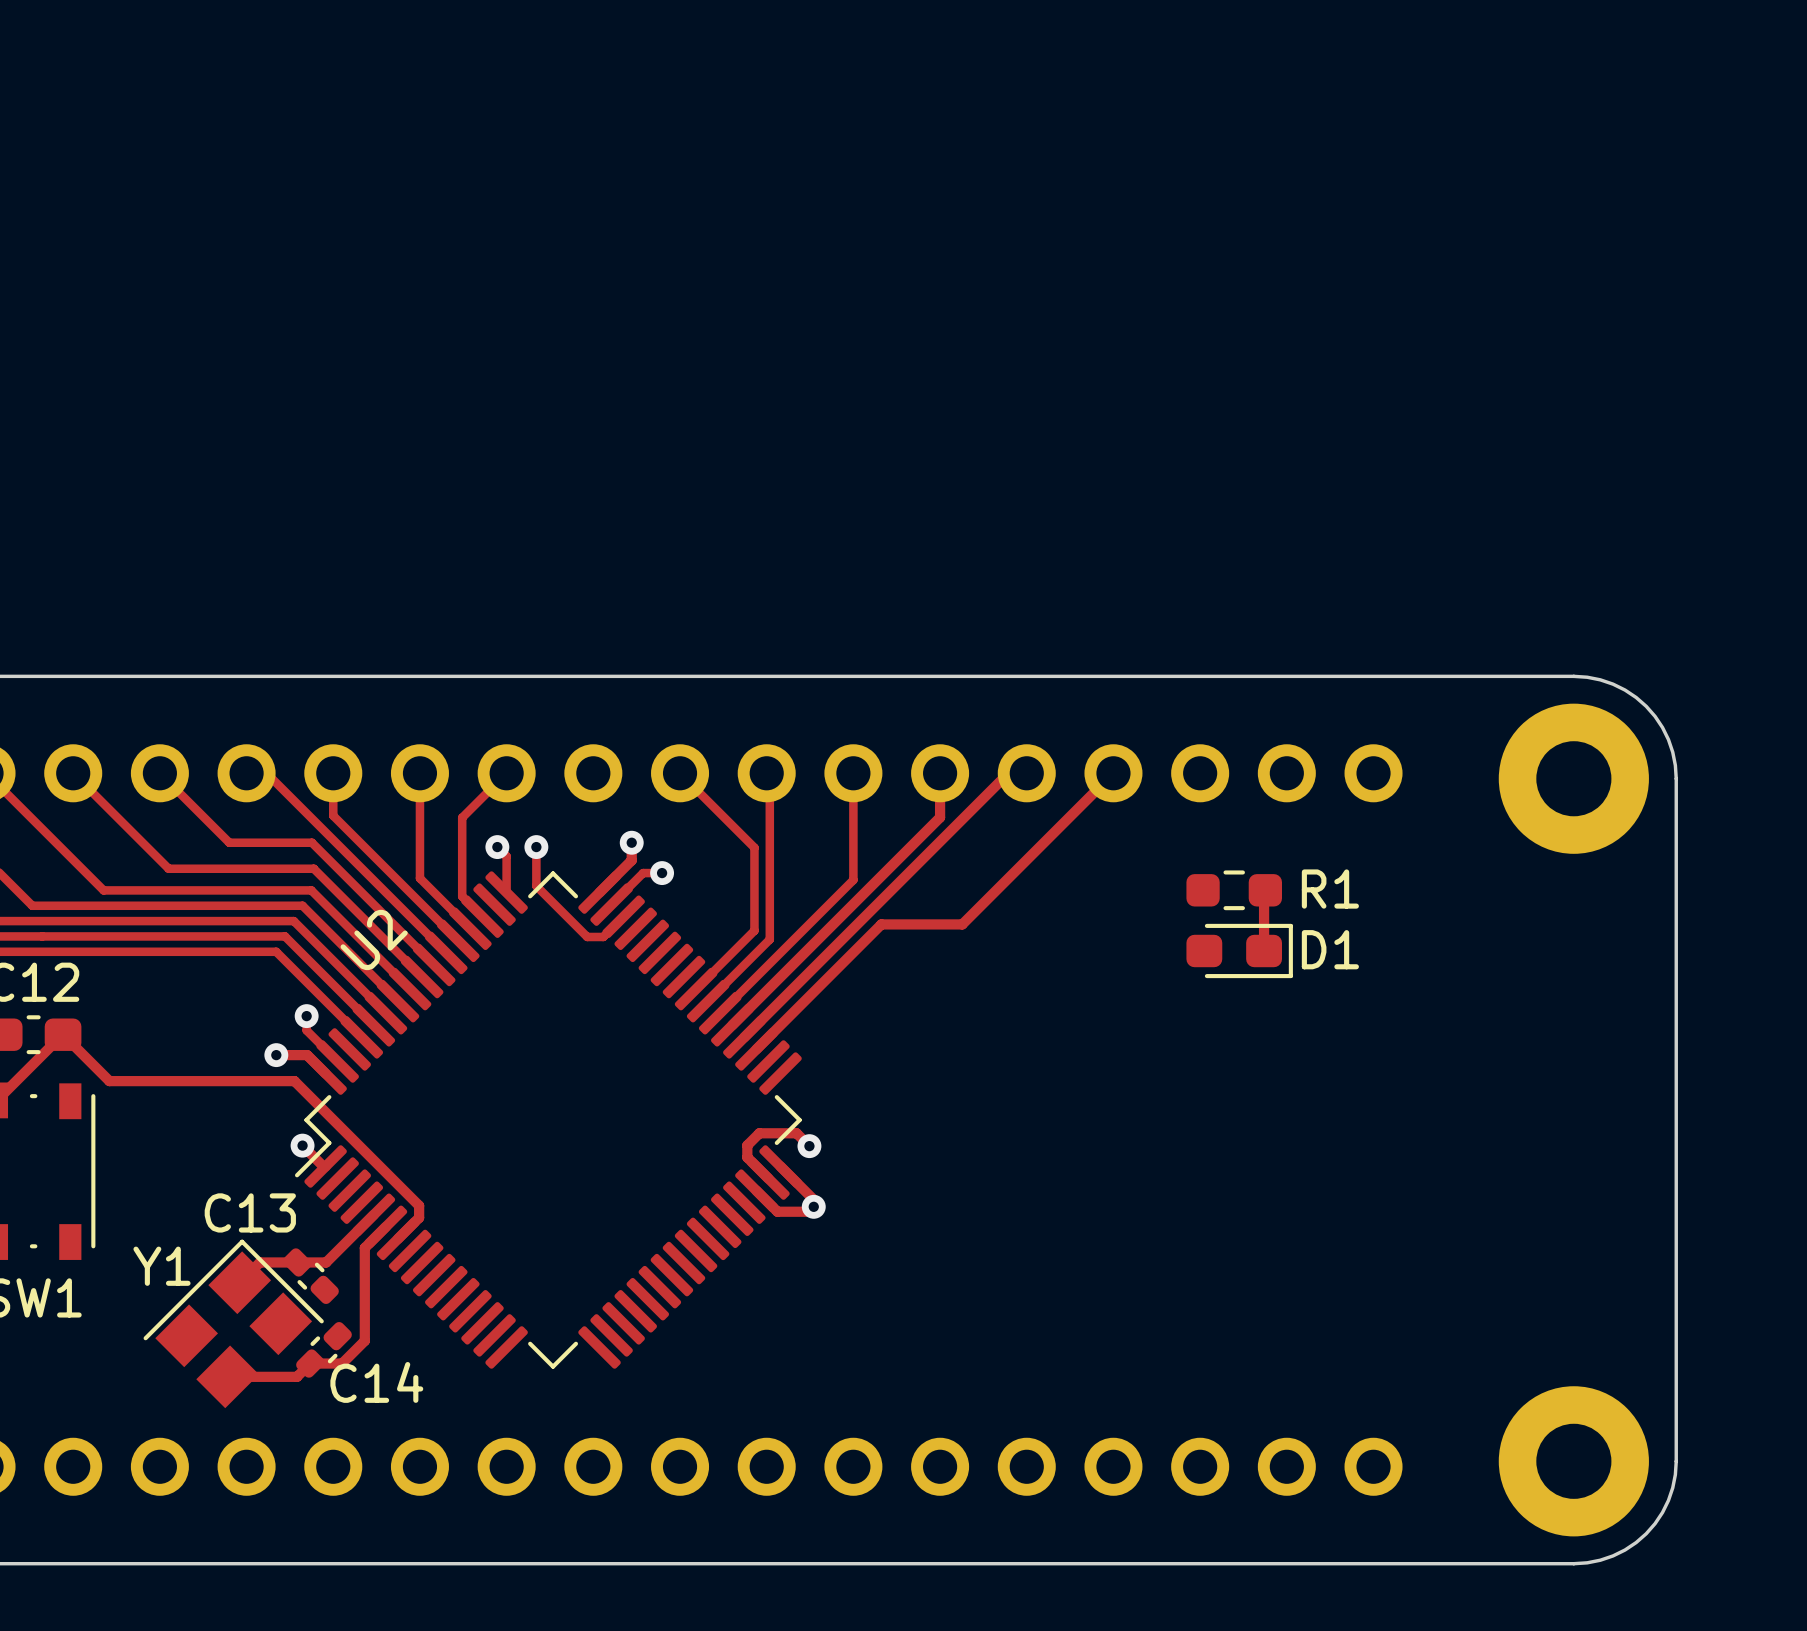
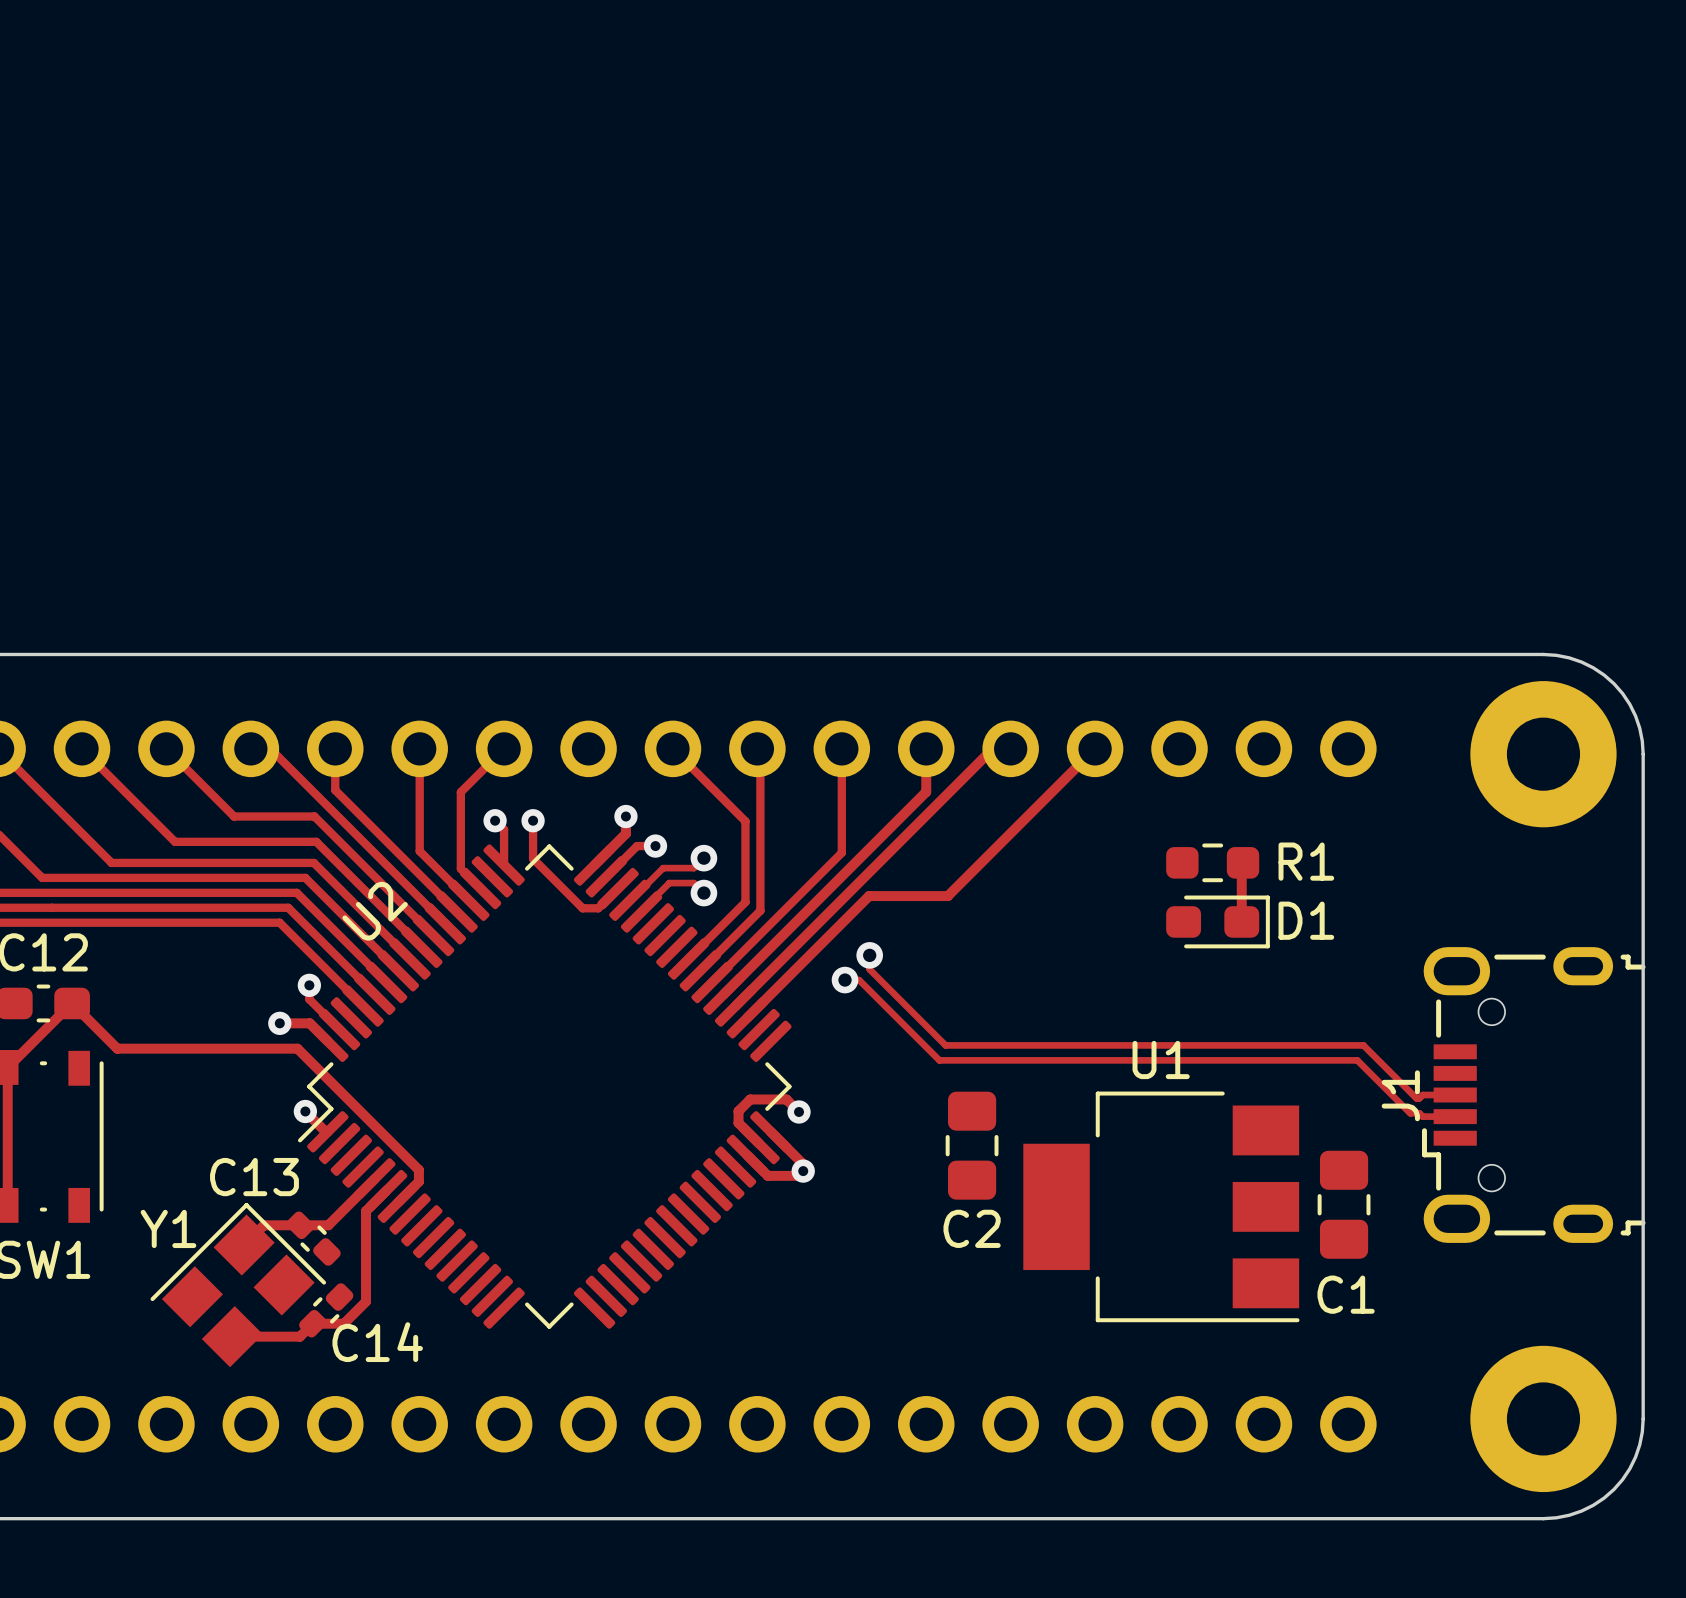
track: none -> (703, 858) (693, 868) (663, 868) (629, 900)
via: none -> (703, 858)
track: none -> (703, 893) (693, 883) (669, 883) (641, 912)
via: none -> (703, 893)
track: none -> (869, 955) (869, 969) (945, 1045) (1363, 1045) (1416, 1098) (1422, 1095) (1455, 1095)
via: none -> (869, 955)
track: none -> (845, 980) (859, 980) (939, 1060) (1357, 1060) (1410, 1113) (1419, 1113) (1422, 1116) (1455, 1116)
via: none -> (845, 980)
J1: none -> (1533, 1095)
C2: none -> (972, 1145)
C1: none -> (1344, 1204)
U1: none -> (1161, 1206)

